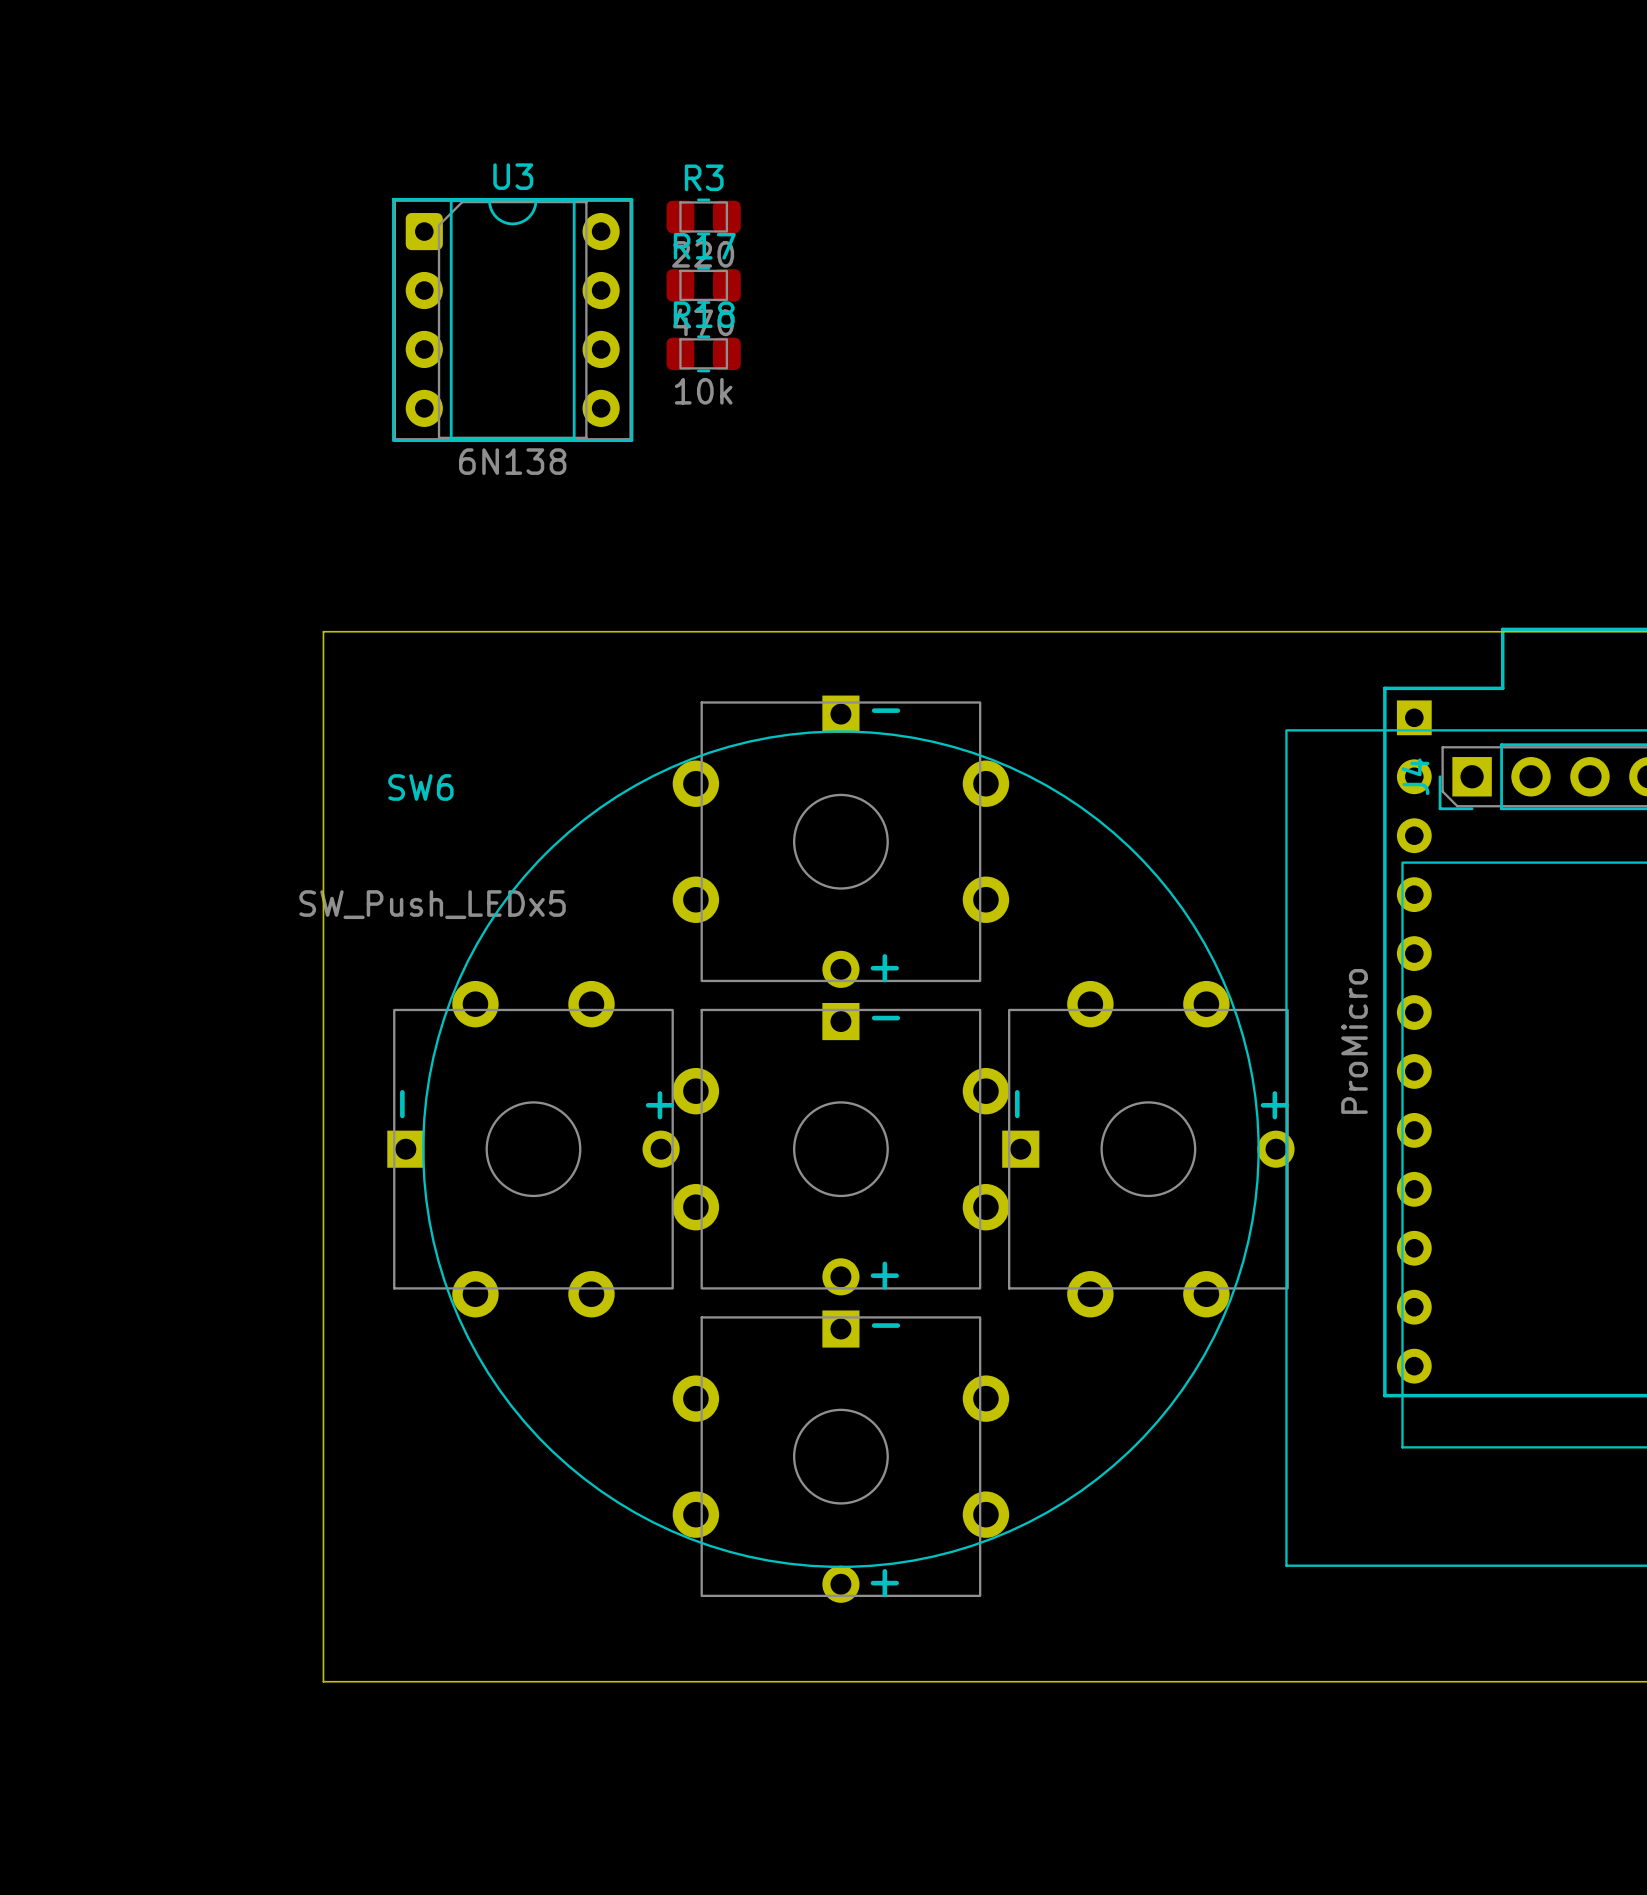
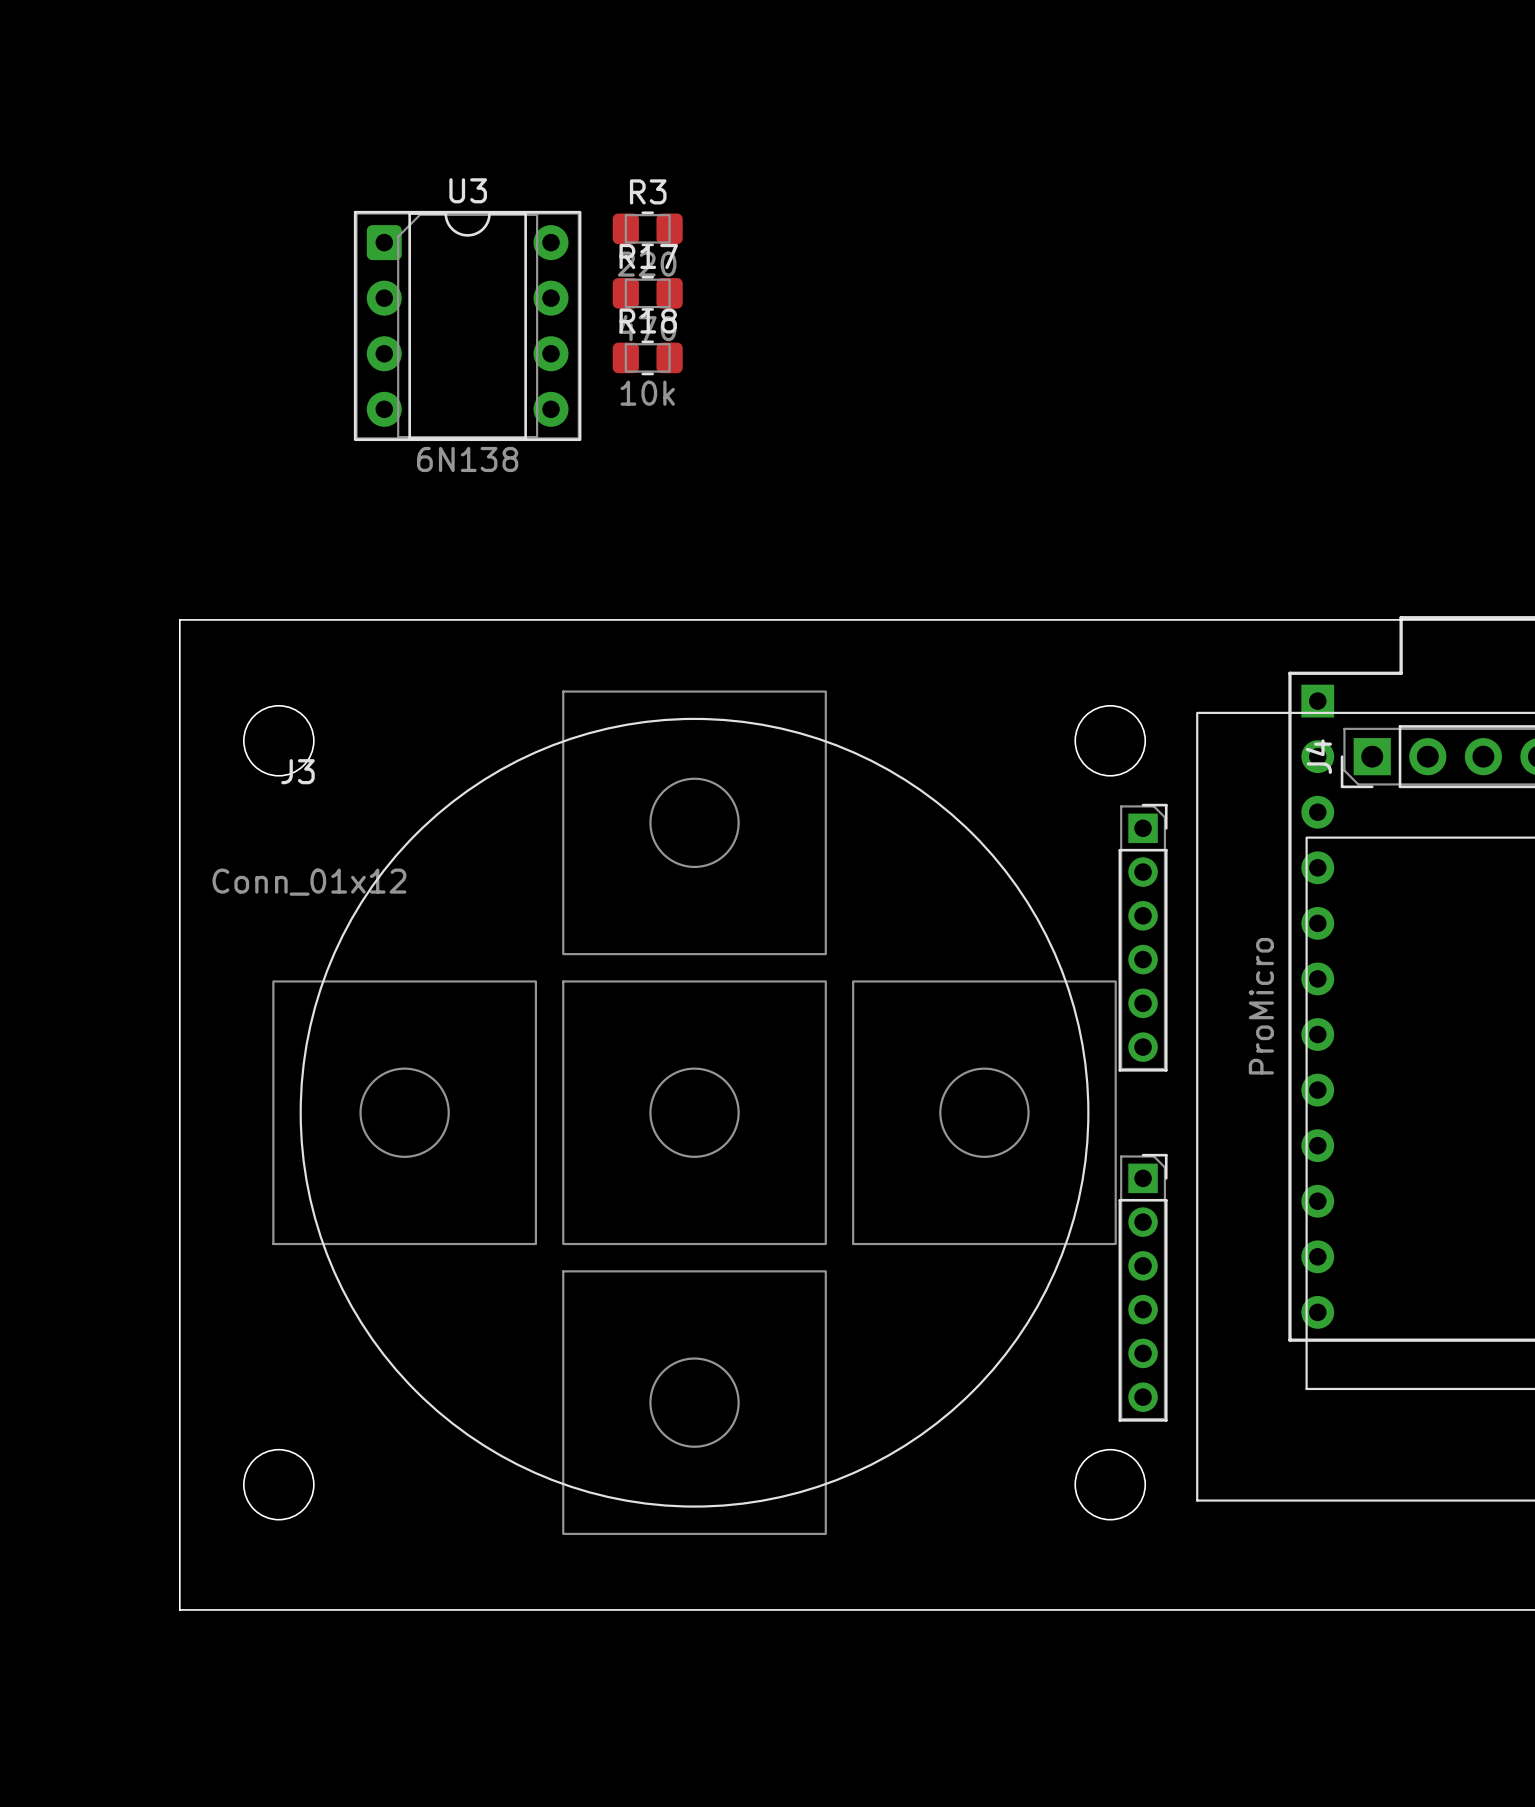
board edge: (323, 631) (323, 1681) -> (289, 619) (179, 619) (179, 1609) (289, 1609)
SW6: SW_Push_LEDx5 (840, 1149) -> none
J3: none -> Conn_01x12 (705, 1112)

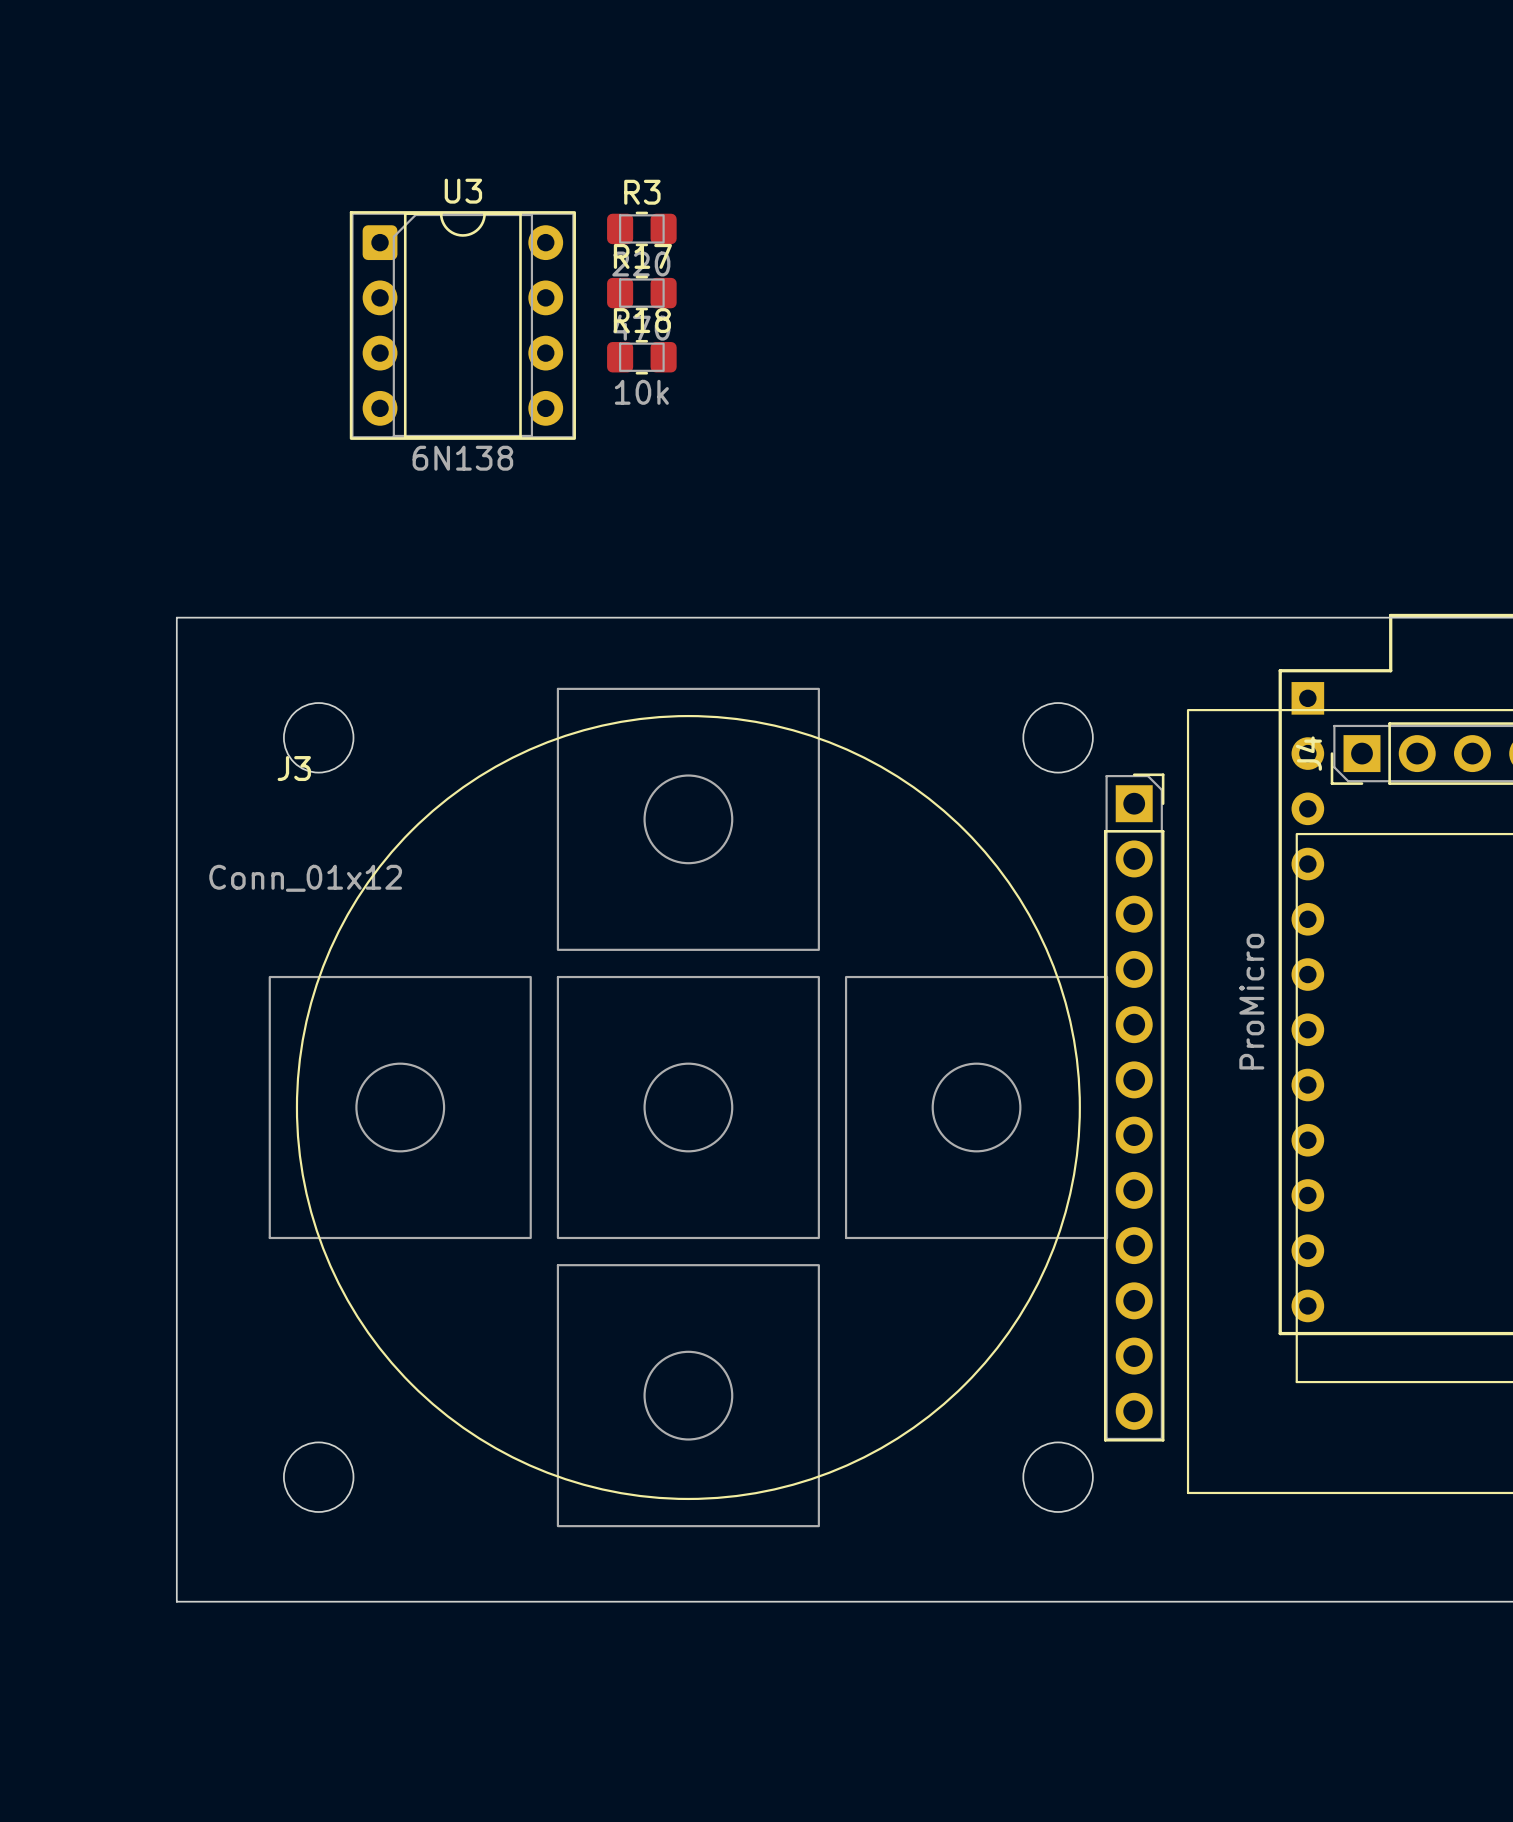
J3 footprint: [243, 690, 1168, 1536] -> [268, 687, 1165, 1528]

